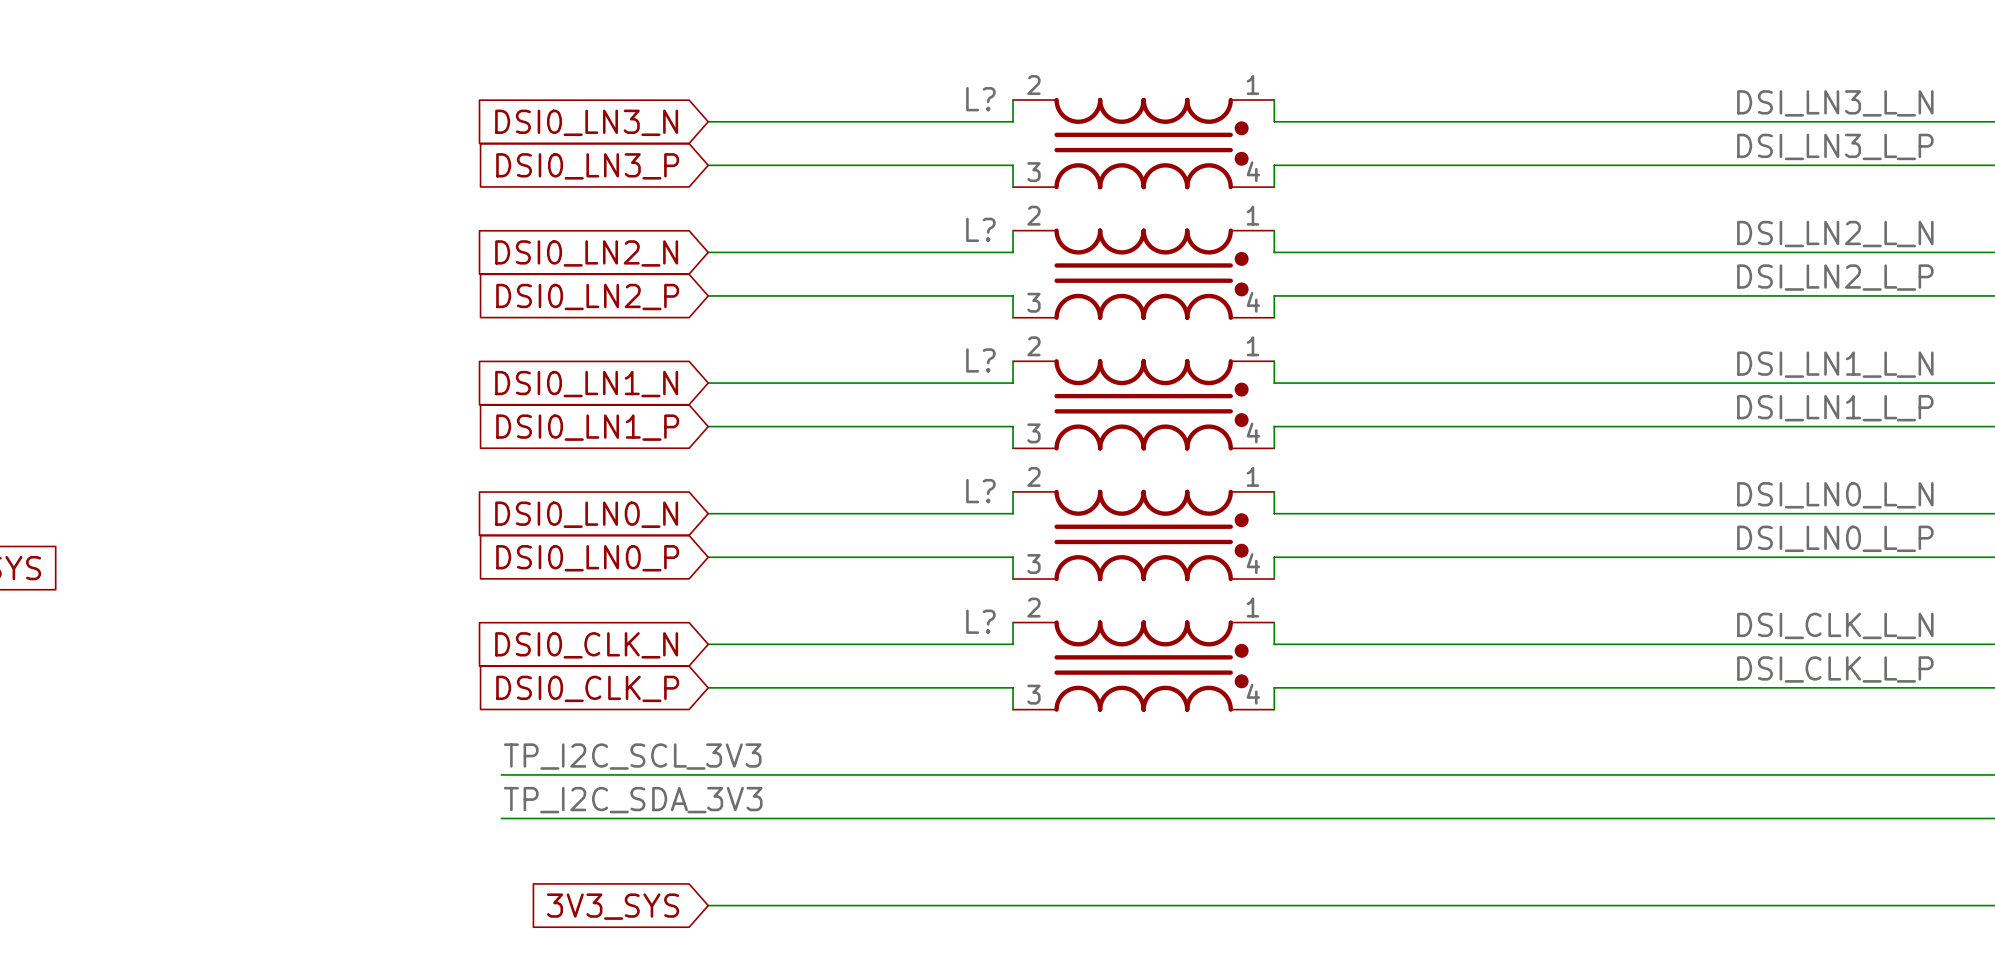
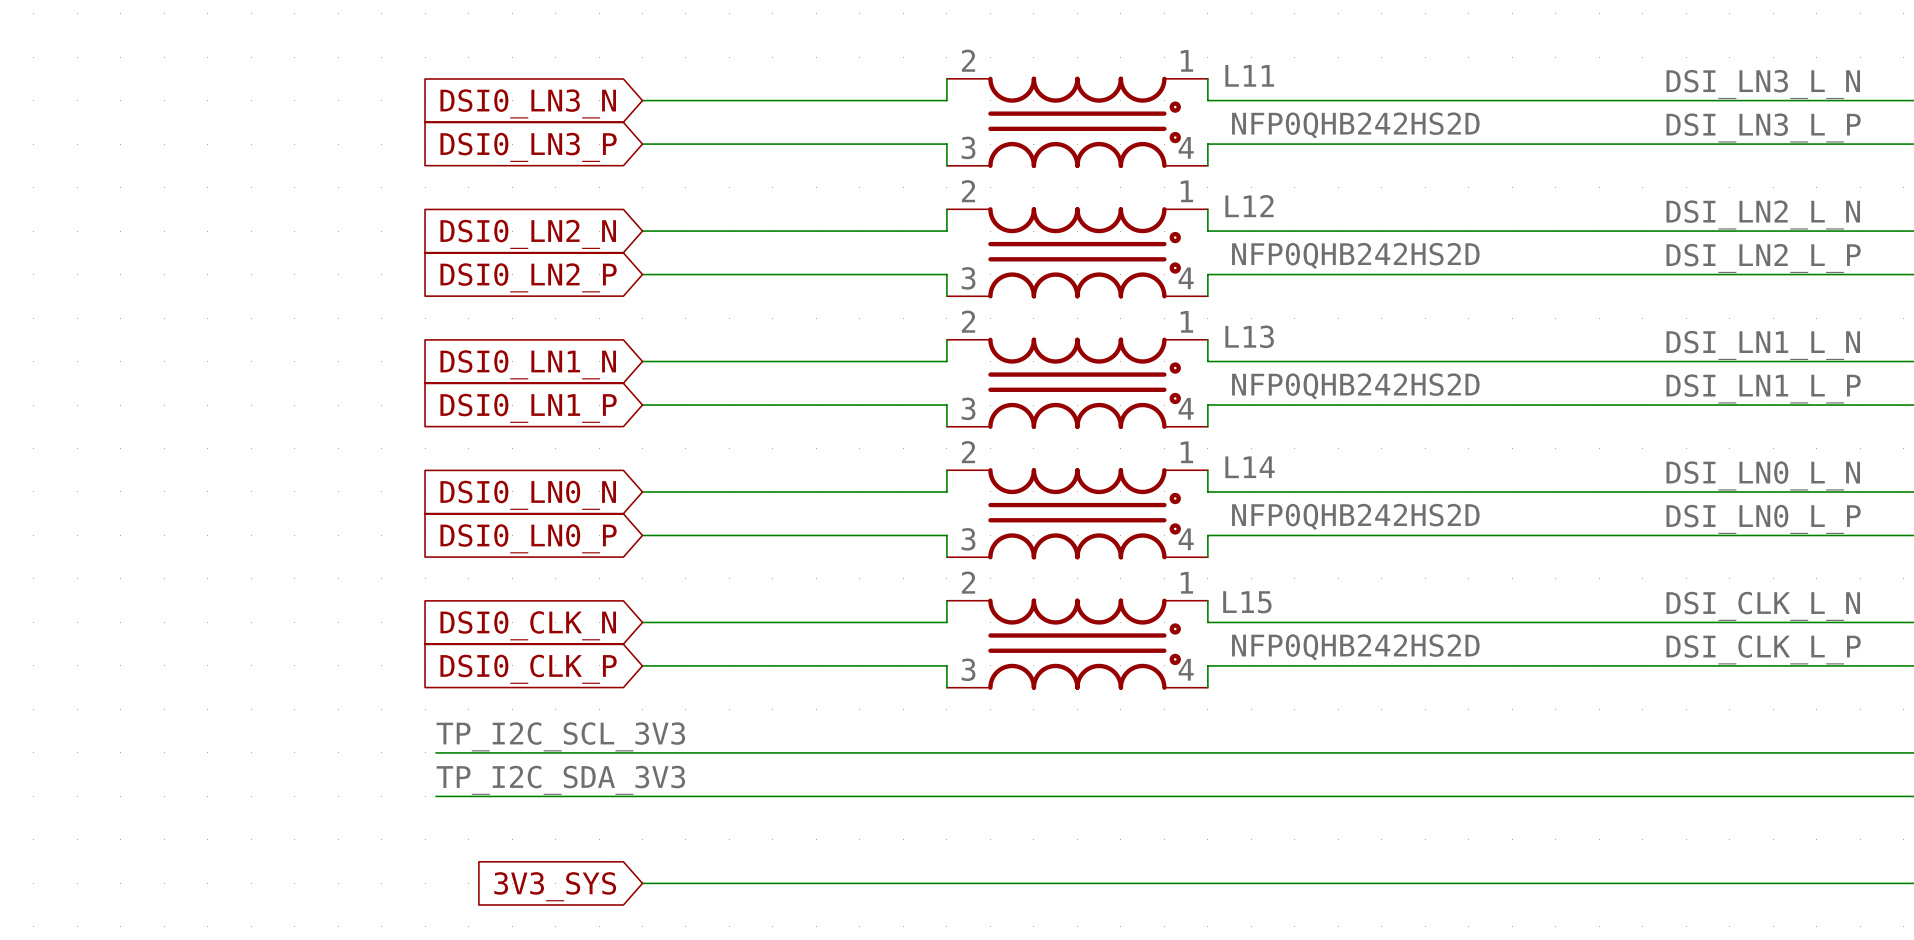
L?: (1143, 143) -> none
L11: none -> NFP0QHB242HS2D (1077, 122)
L?: (1143, 274) -> none
L12: none -> NFP0QHB242HS2D (1077, 252)
L?: (1143, 404) -> none
L13: none -> NFP0QHB242HS2D (1077, 383)
L?: (1143, 535) -> none
L14: none -> NFP0QHB242HS2D (1077, 513)
L?: (1143, 666) -> none
L15: none -> NFP0QHB242HS2D (1077, 644)

